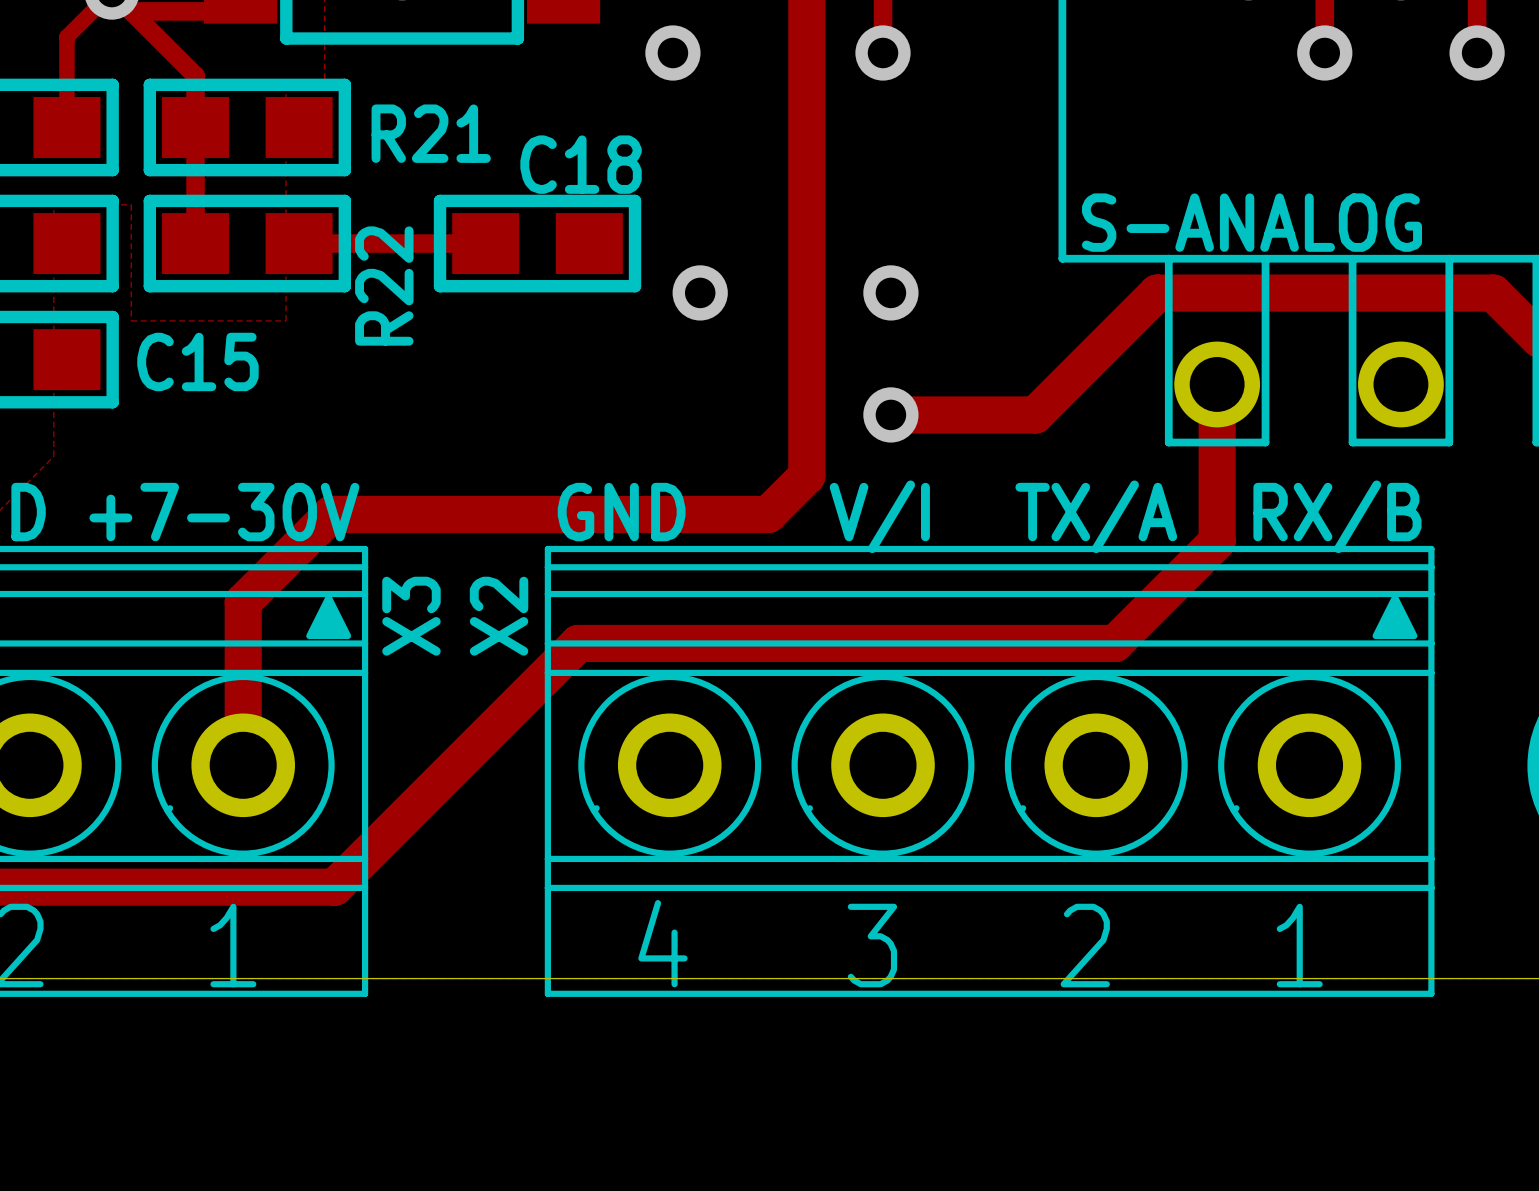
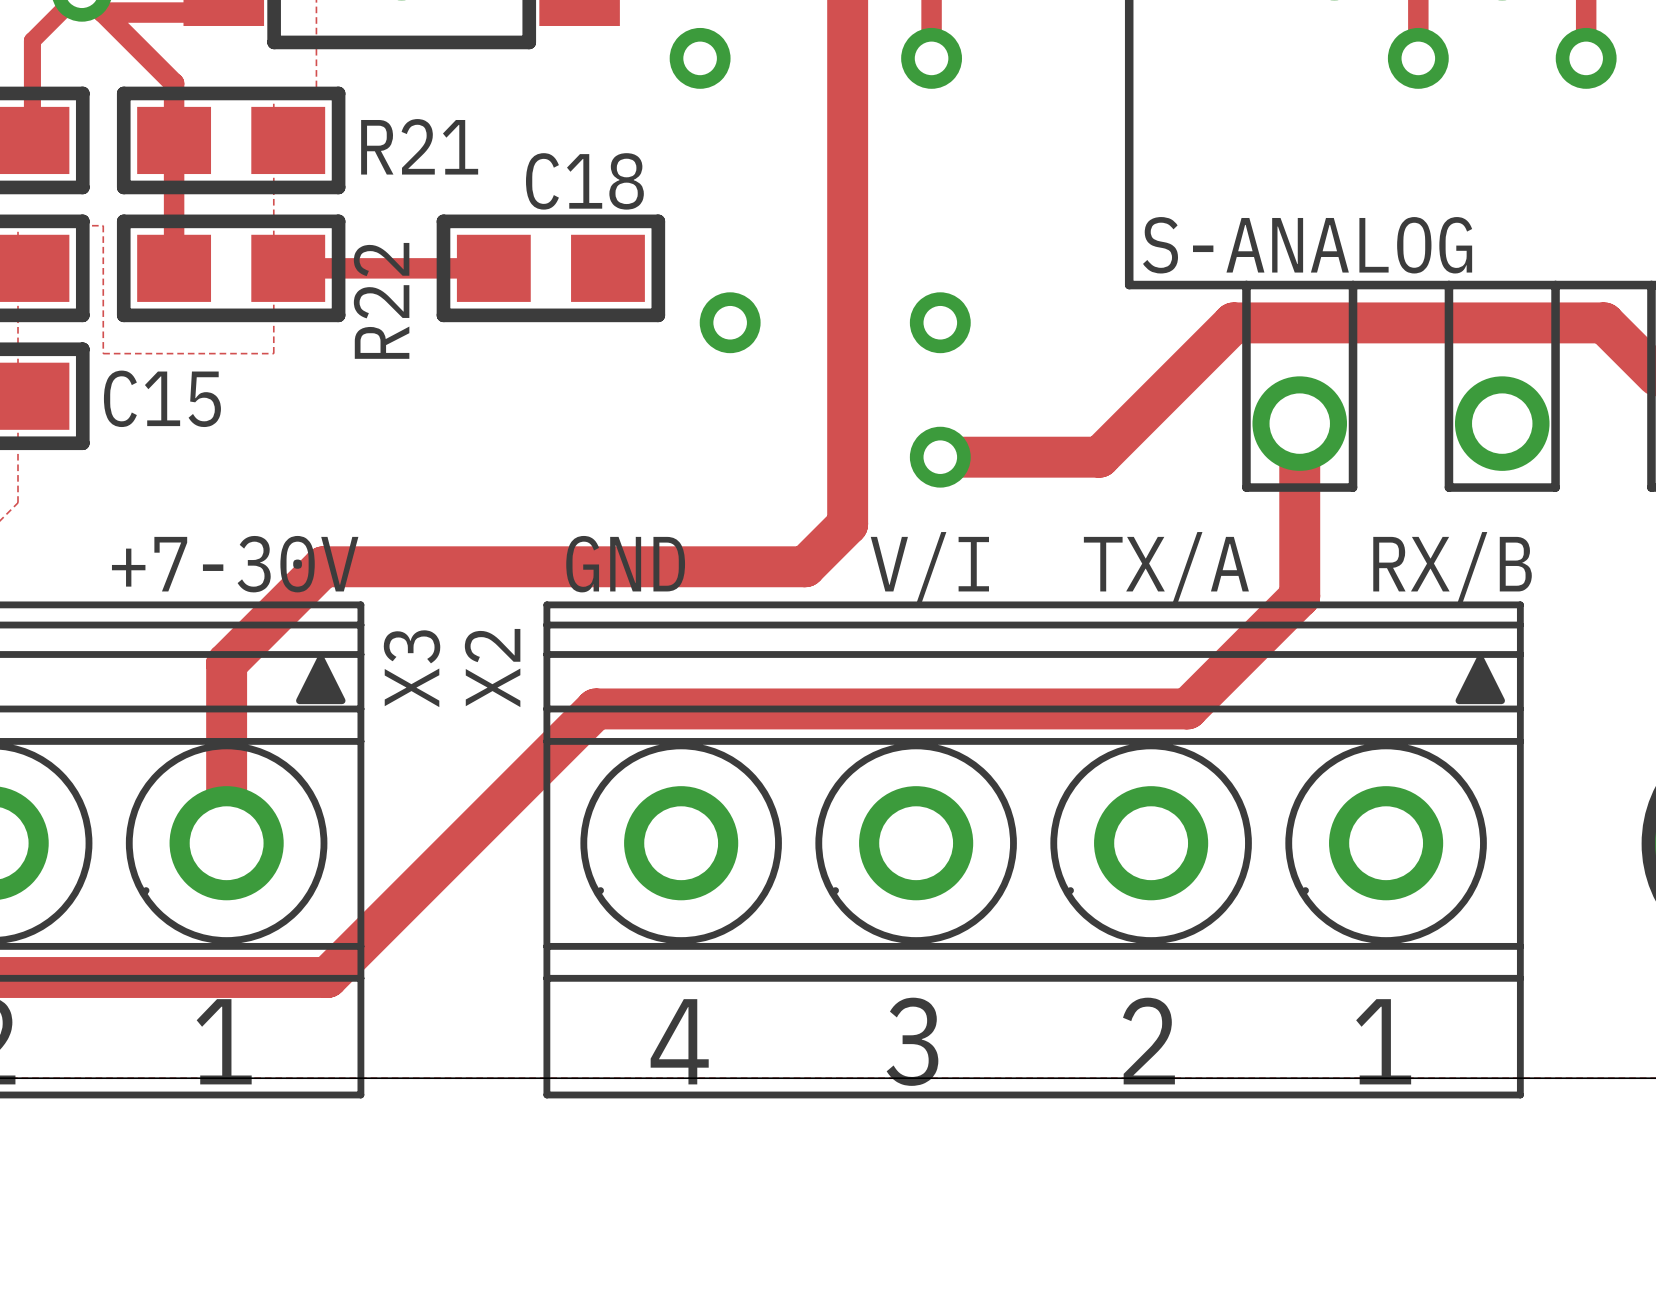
X2 position: (989, 771) -> (1033, 849)

